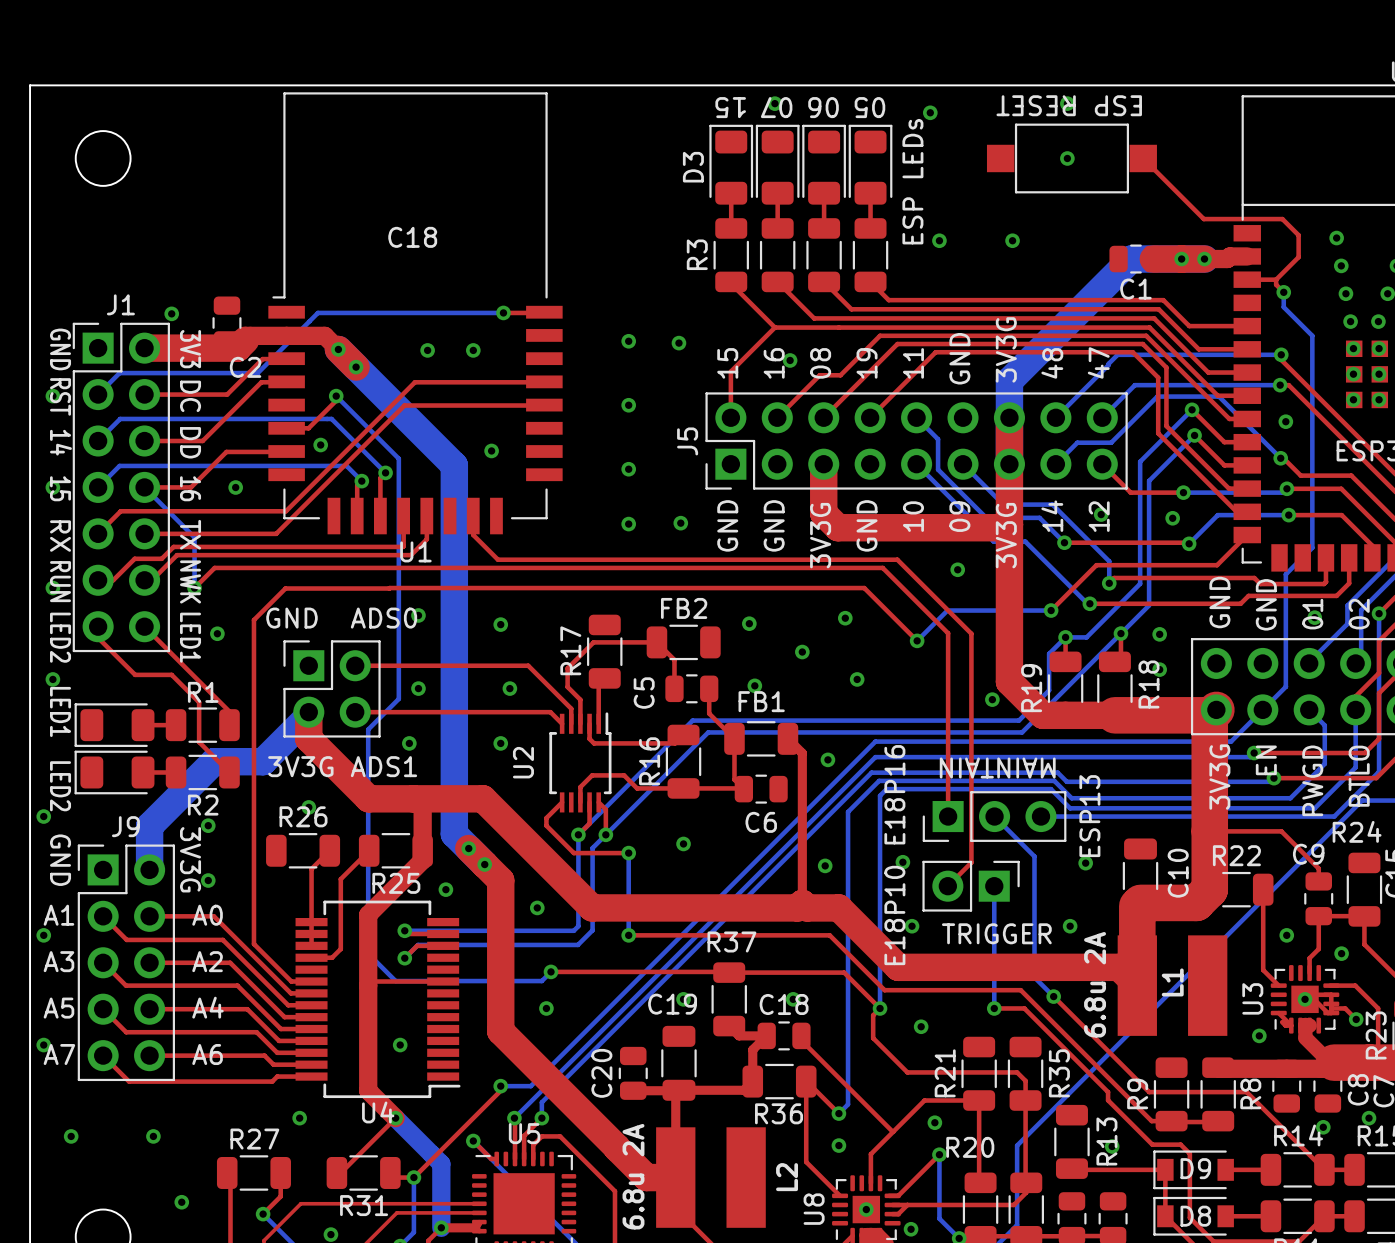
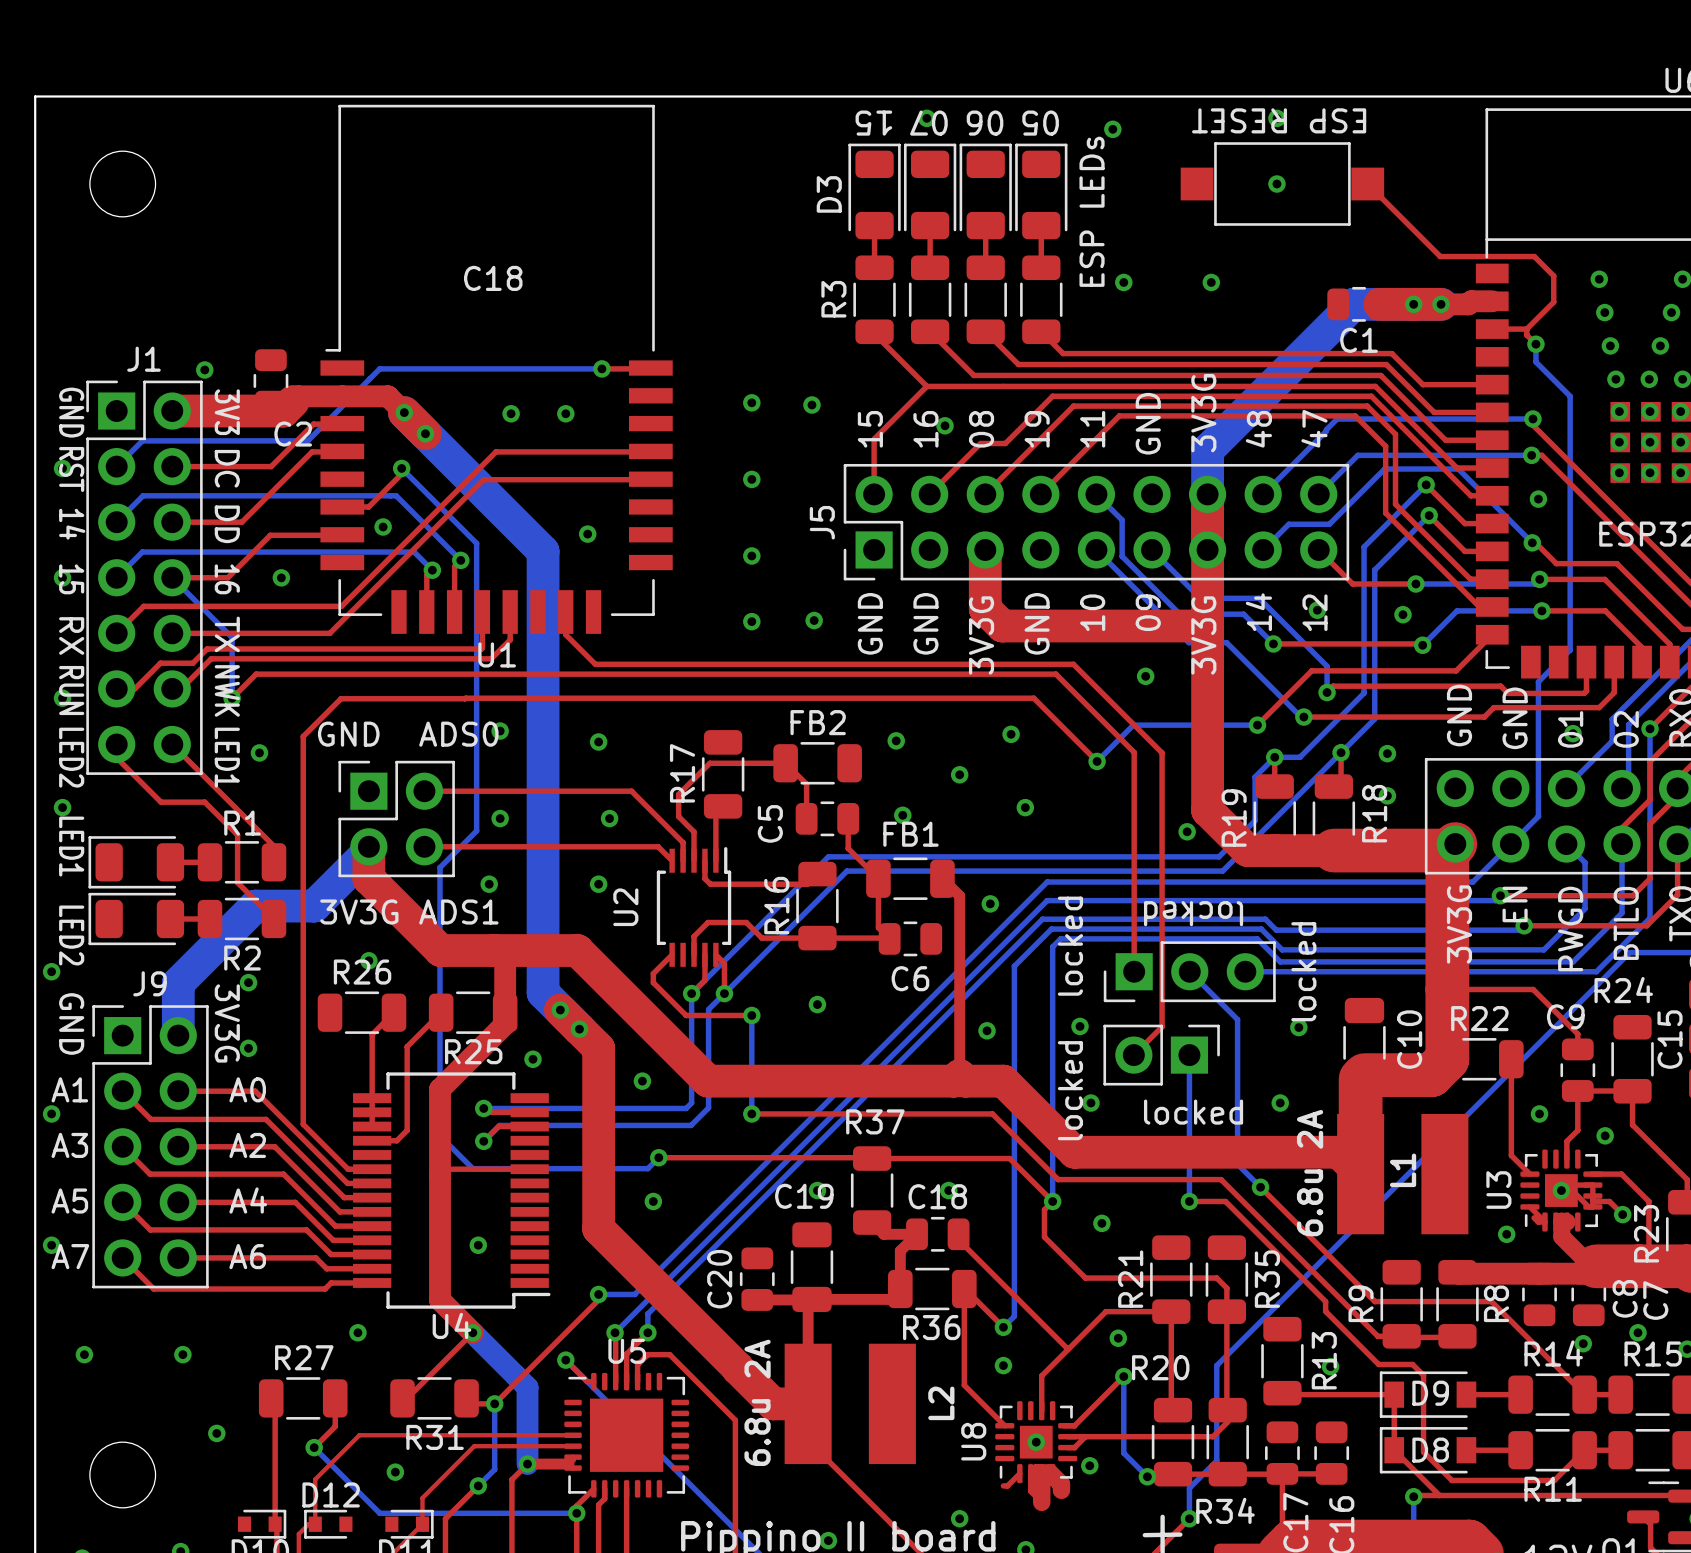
text: MAINTAIN (997, 768) -> locked (1193, 913)
text: E18P16 (894, 794) -> locked (1070, 946)
text: ESP13 (1089, 816) -> locked (1303, 971)
text: E18P10 (894, 915) -> locked (1070, 1090)
text: TRIGGER (996, 933) -> locked (1193, 1112)

